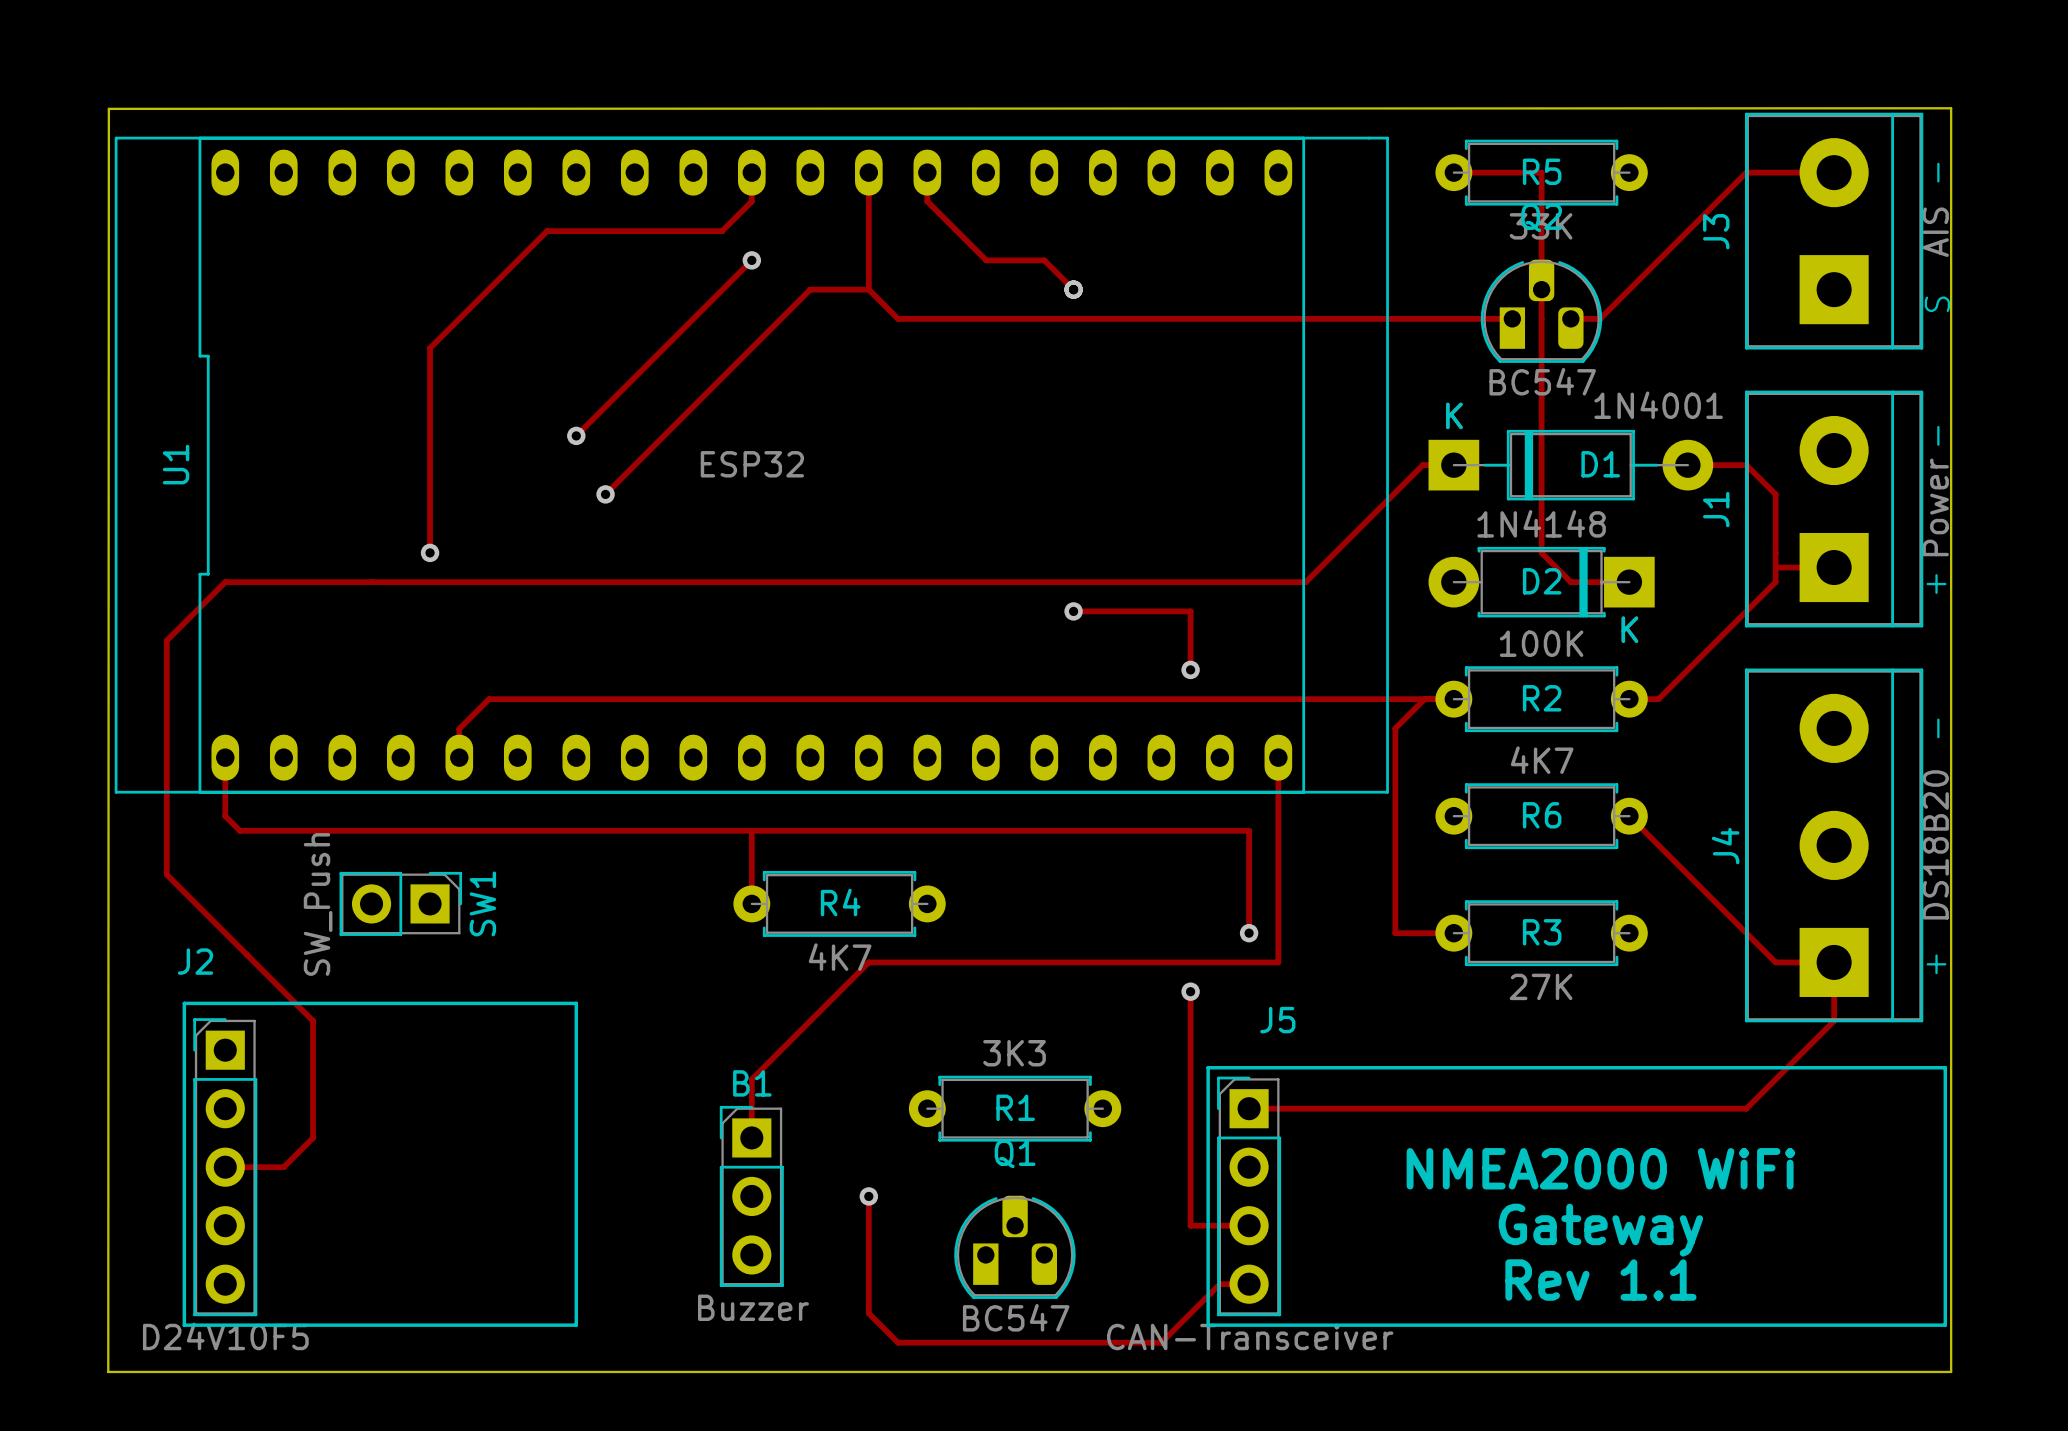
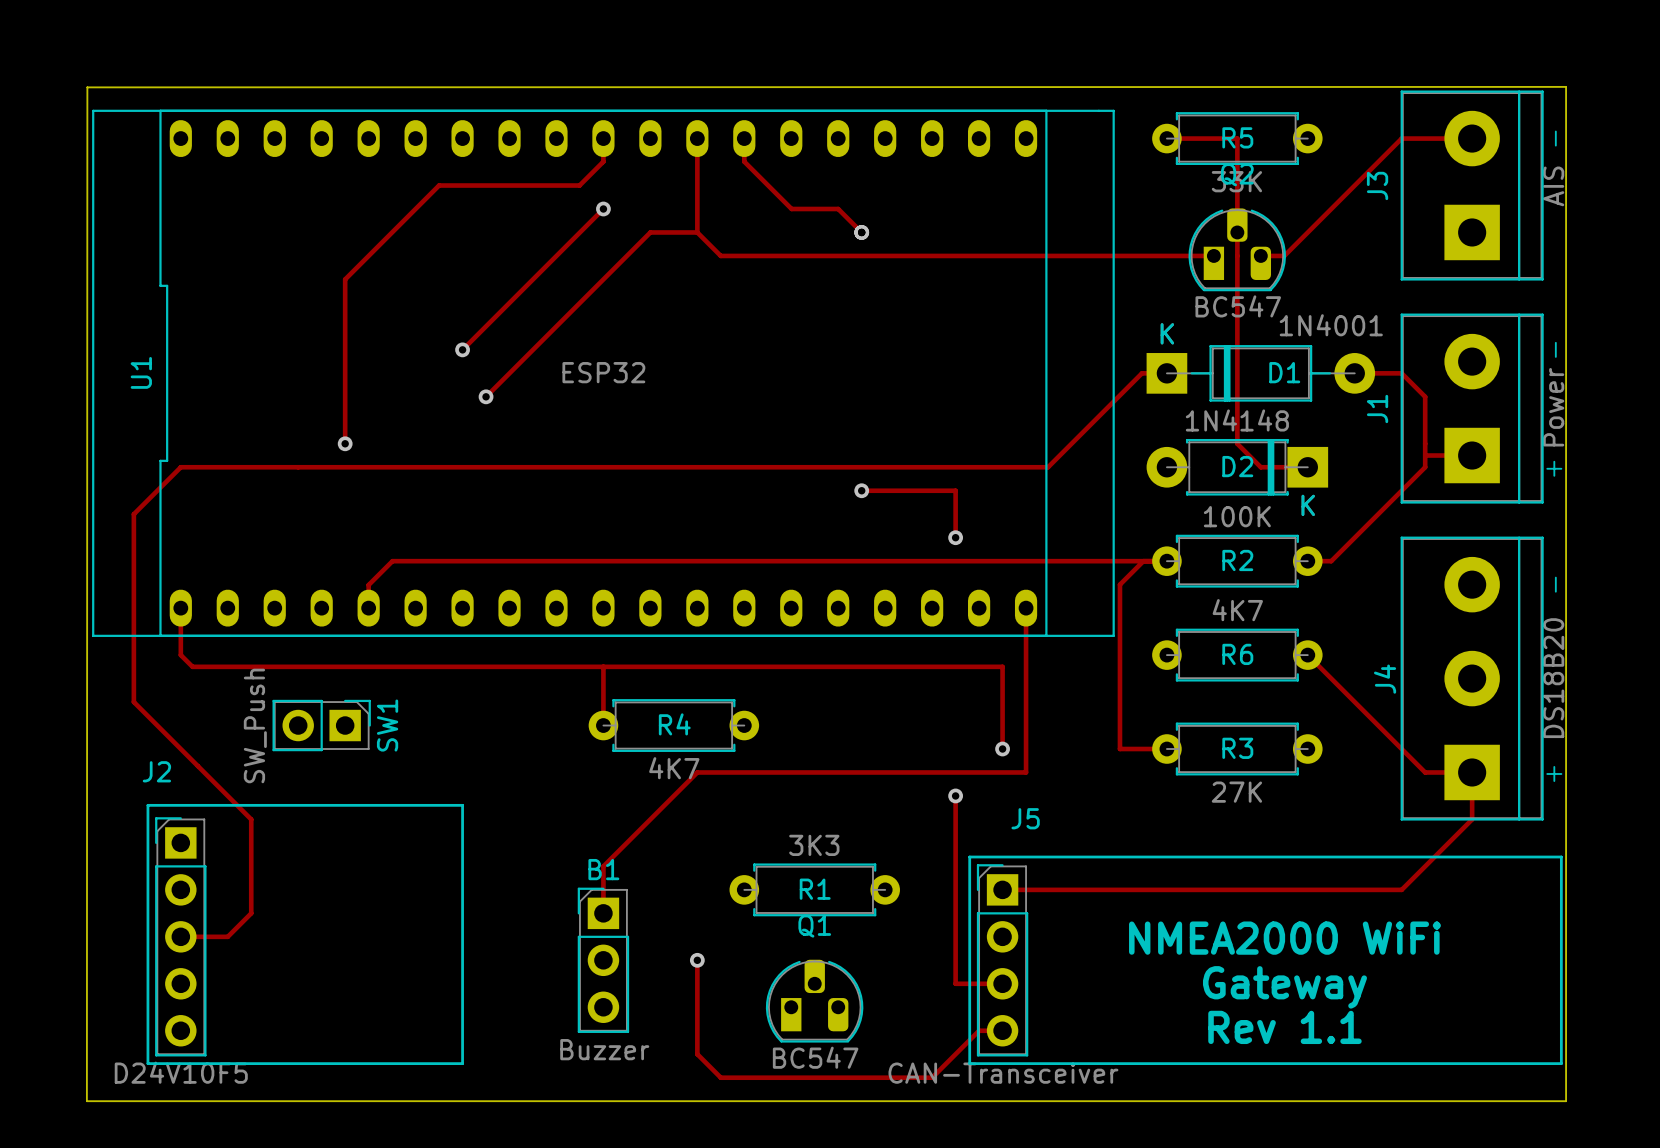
text: S (1937, 304) -> none

